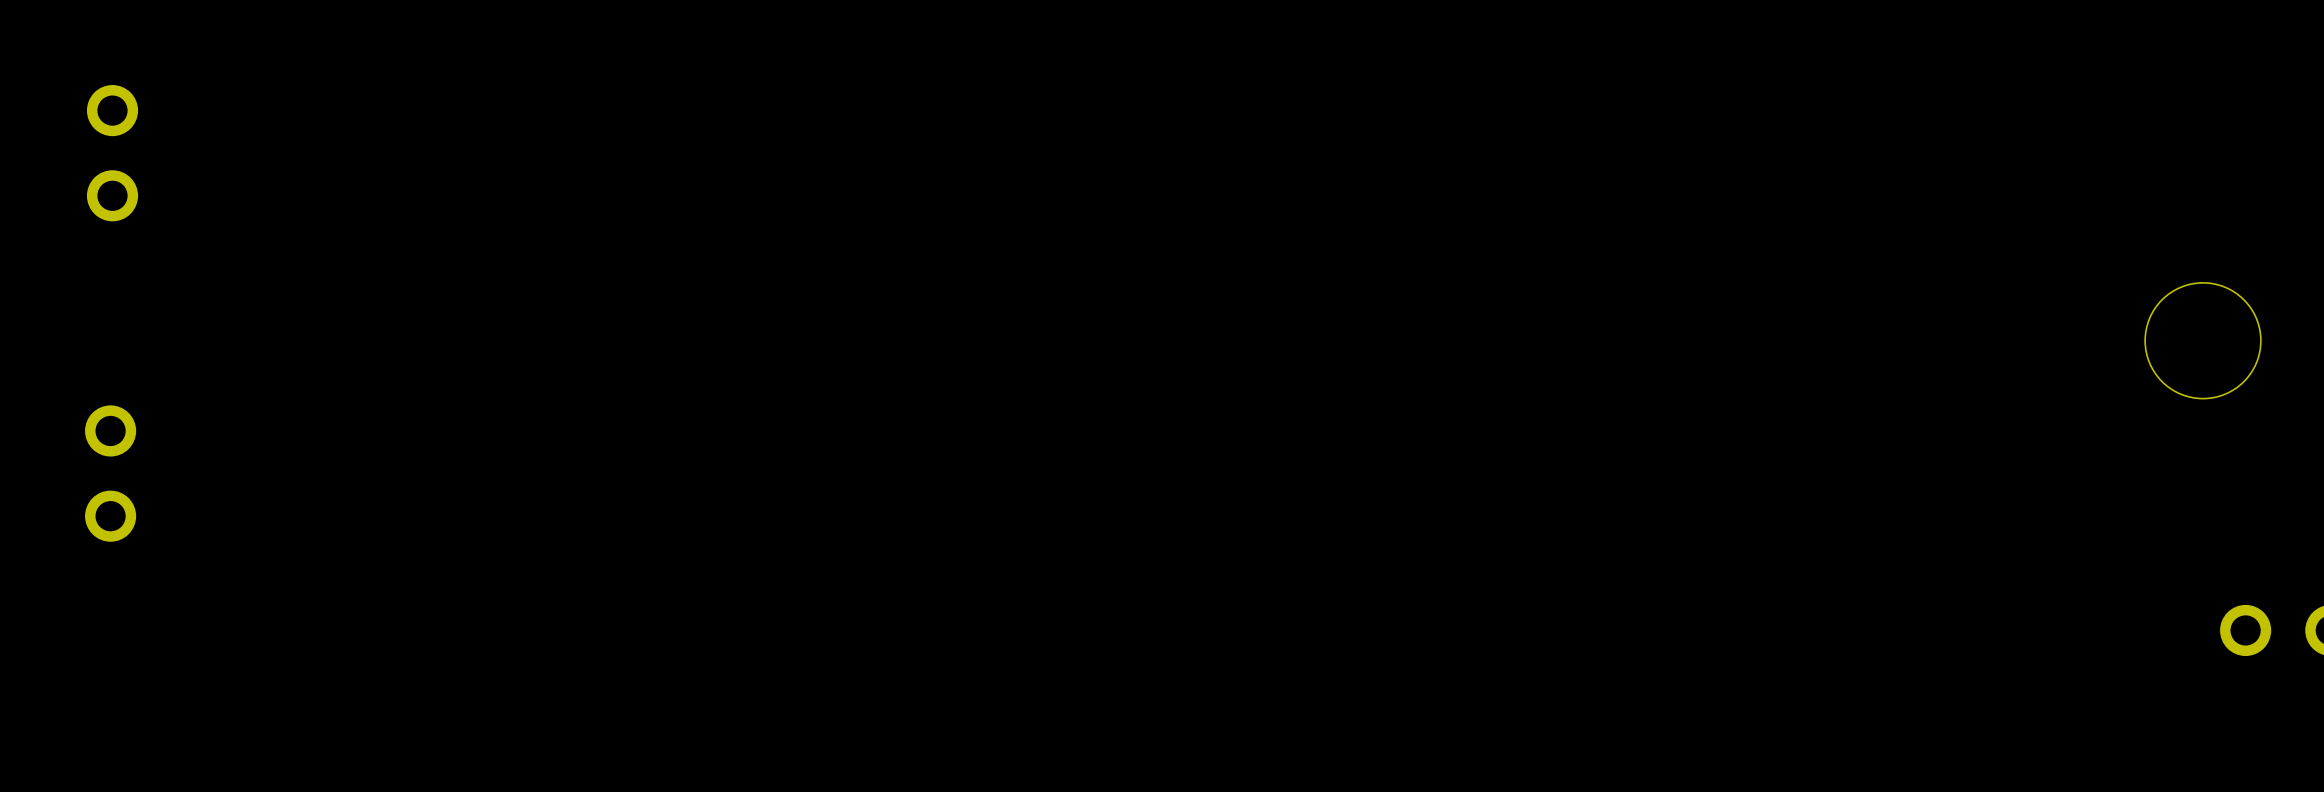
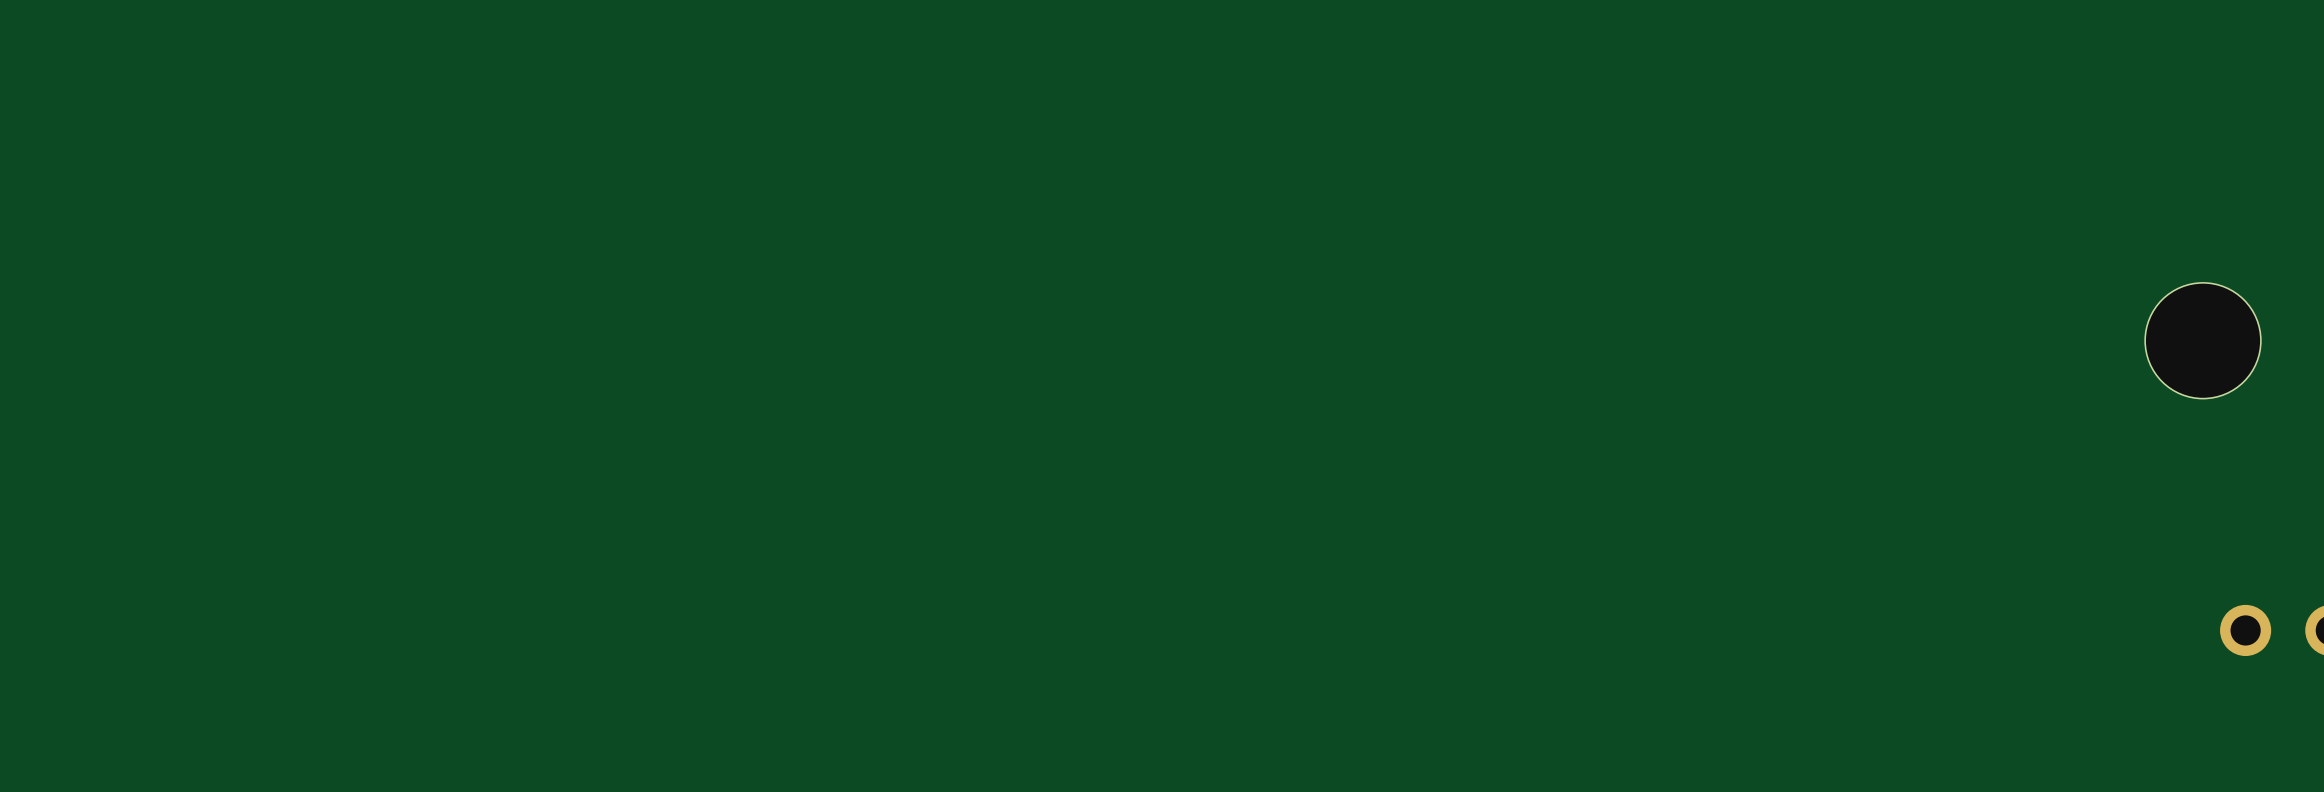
part: (112, 153) -> none
part: (110, 473) -> none

